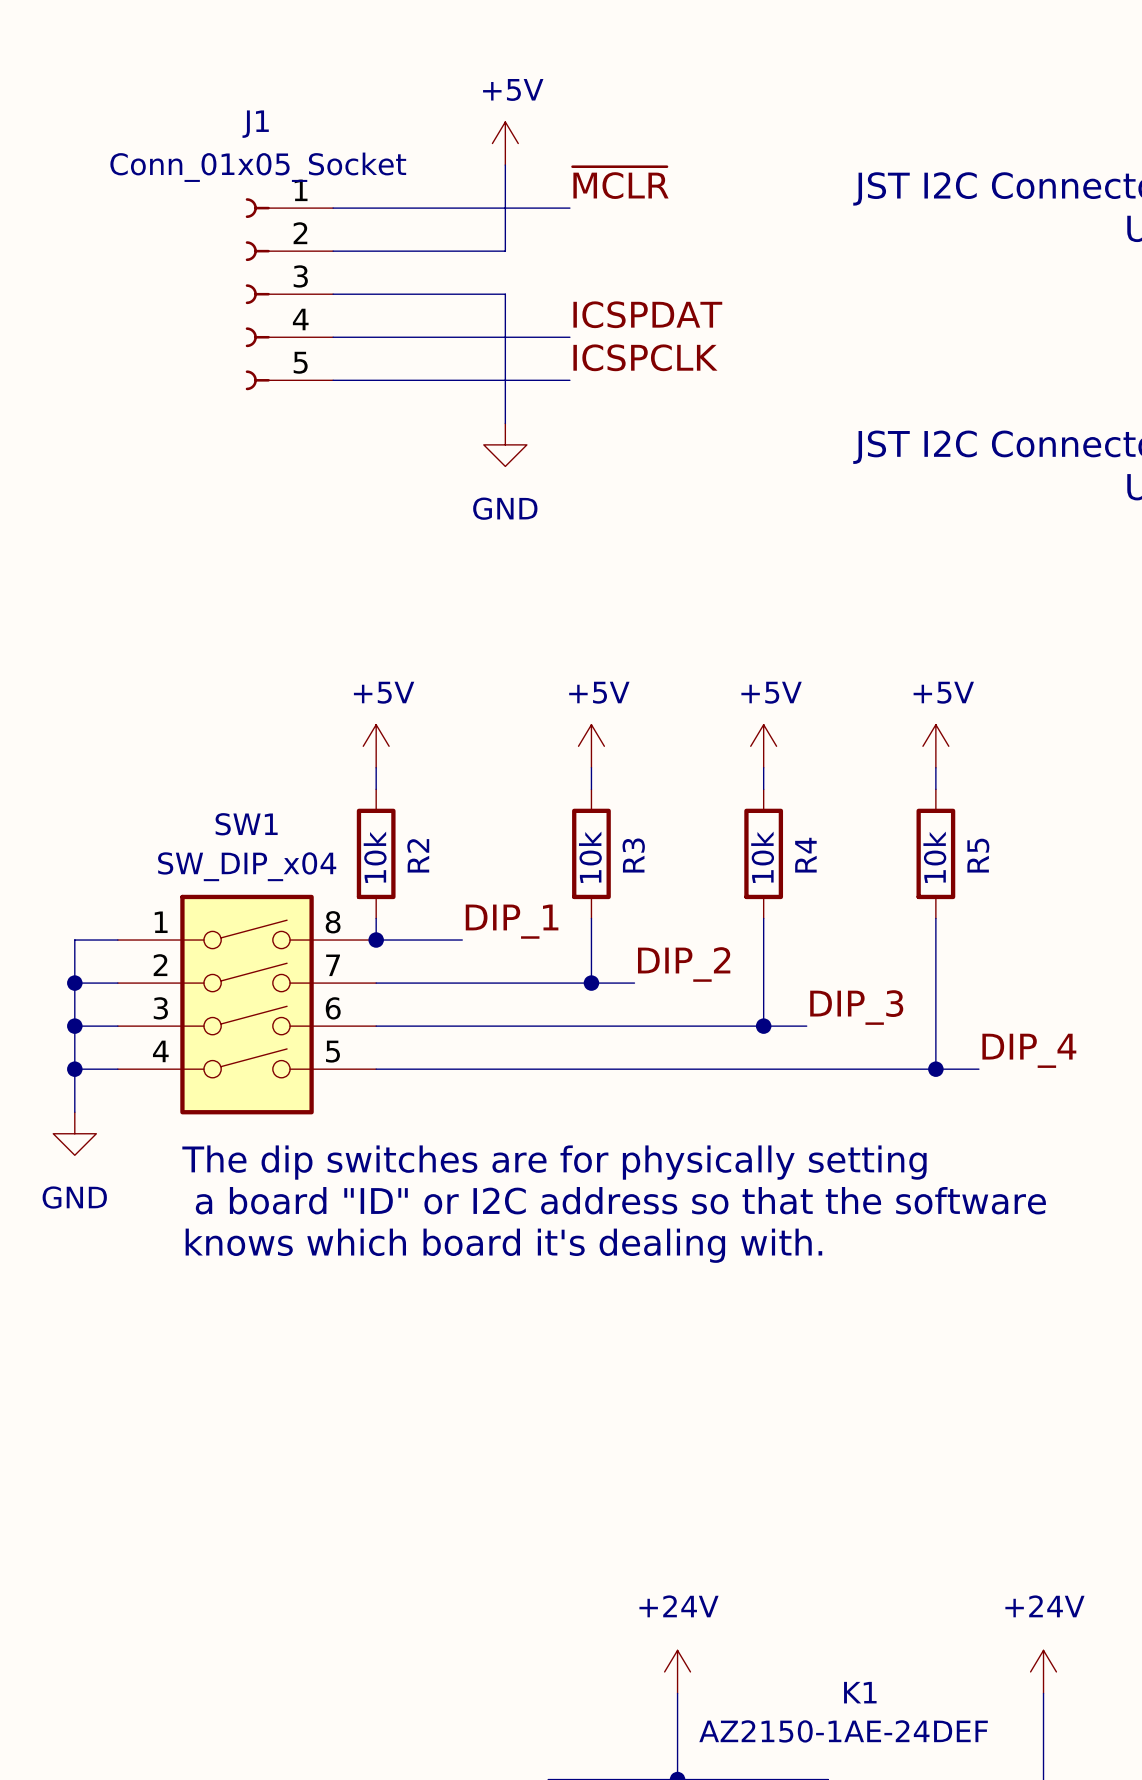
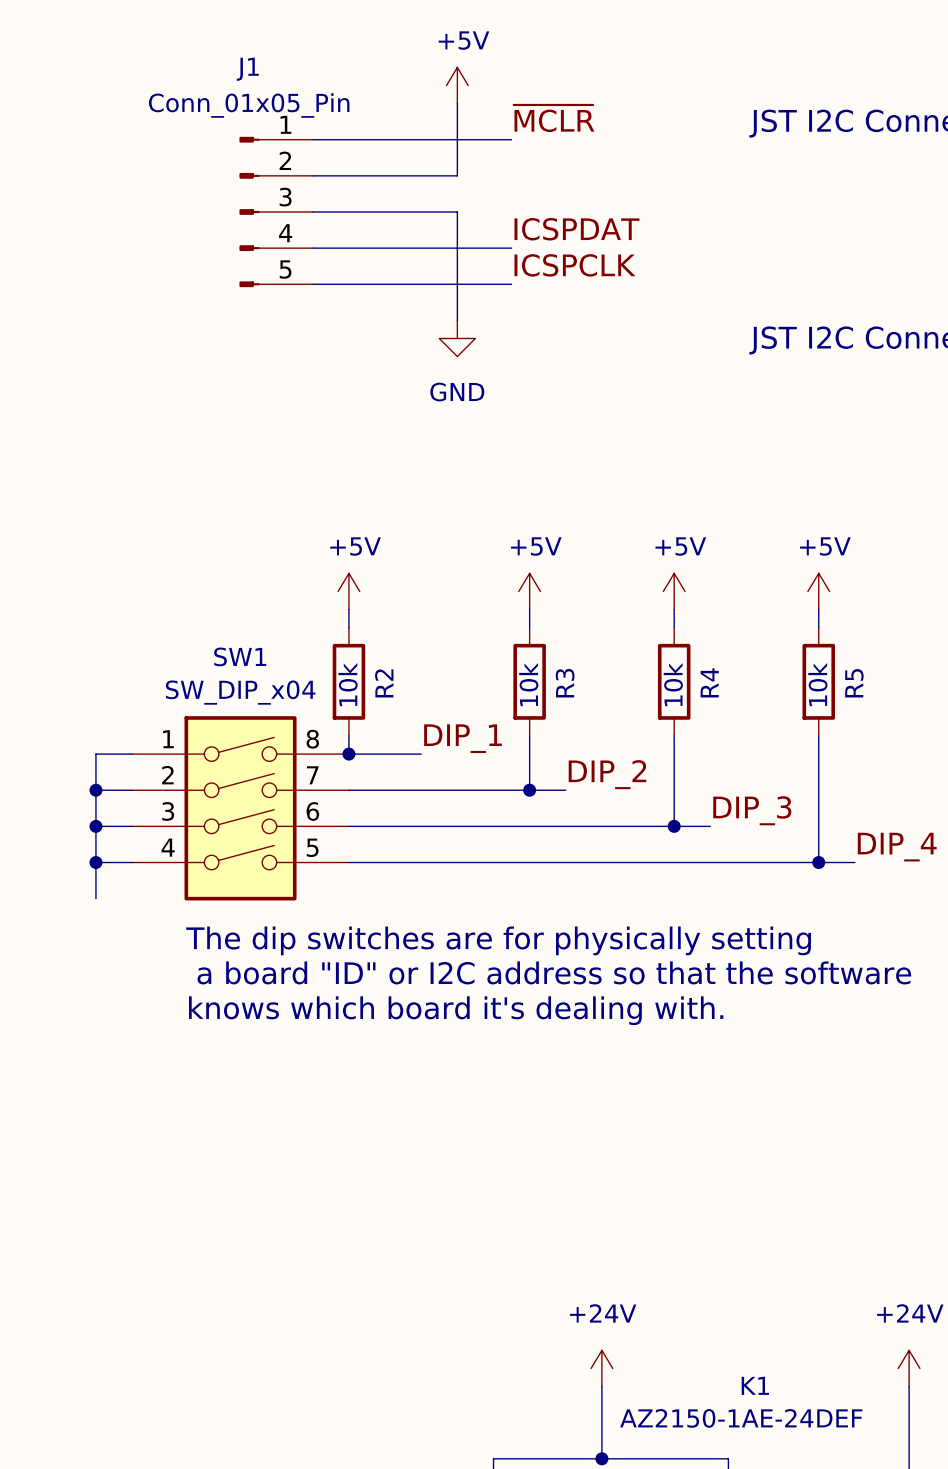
J1 value: Conn_01x05_Socket (258, 167) -> Conn_01x05_Pin (249, 105)
J1 symbol: [245, 198, 334, 391] -> [239, 136, 313, 288]
power symbol: GND (74, 1133) -> none

